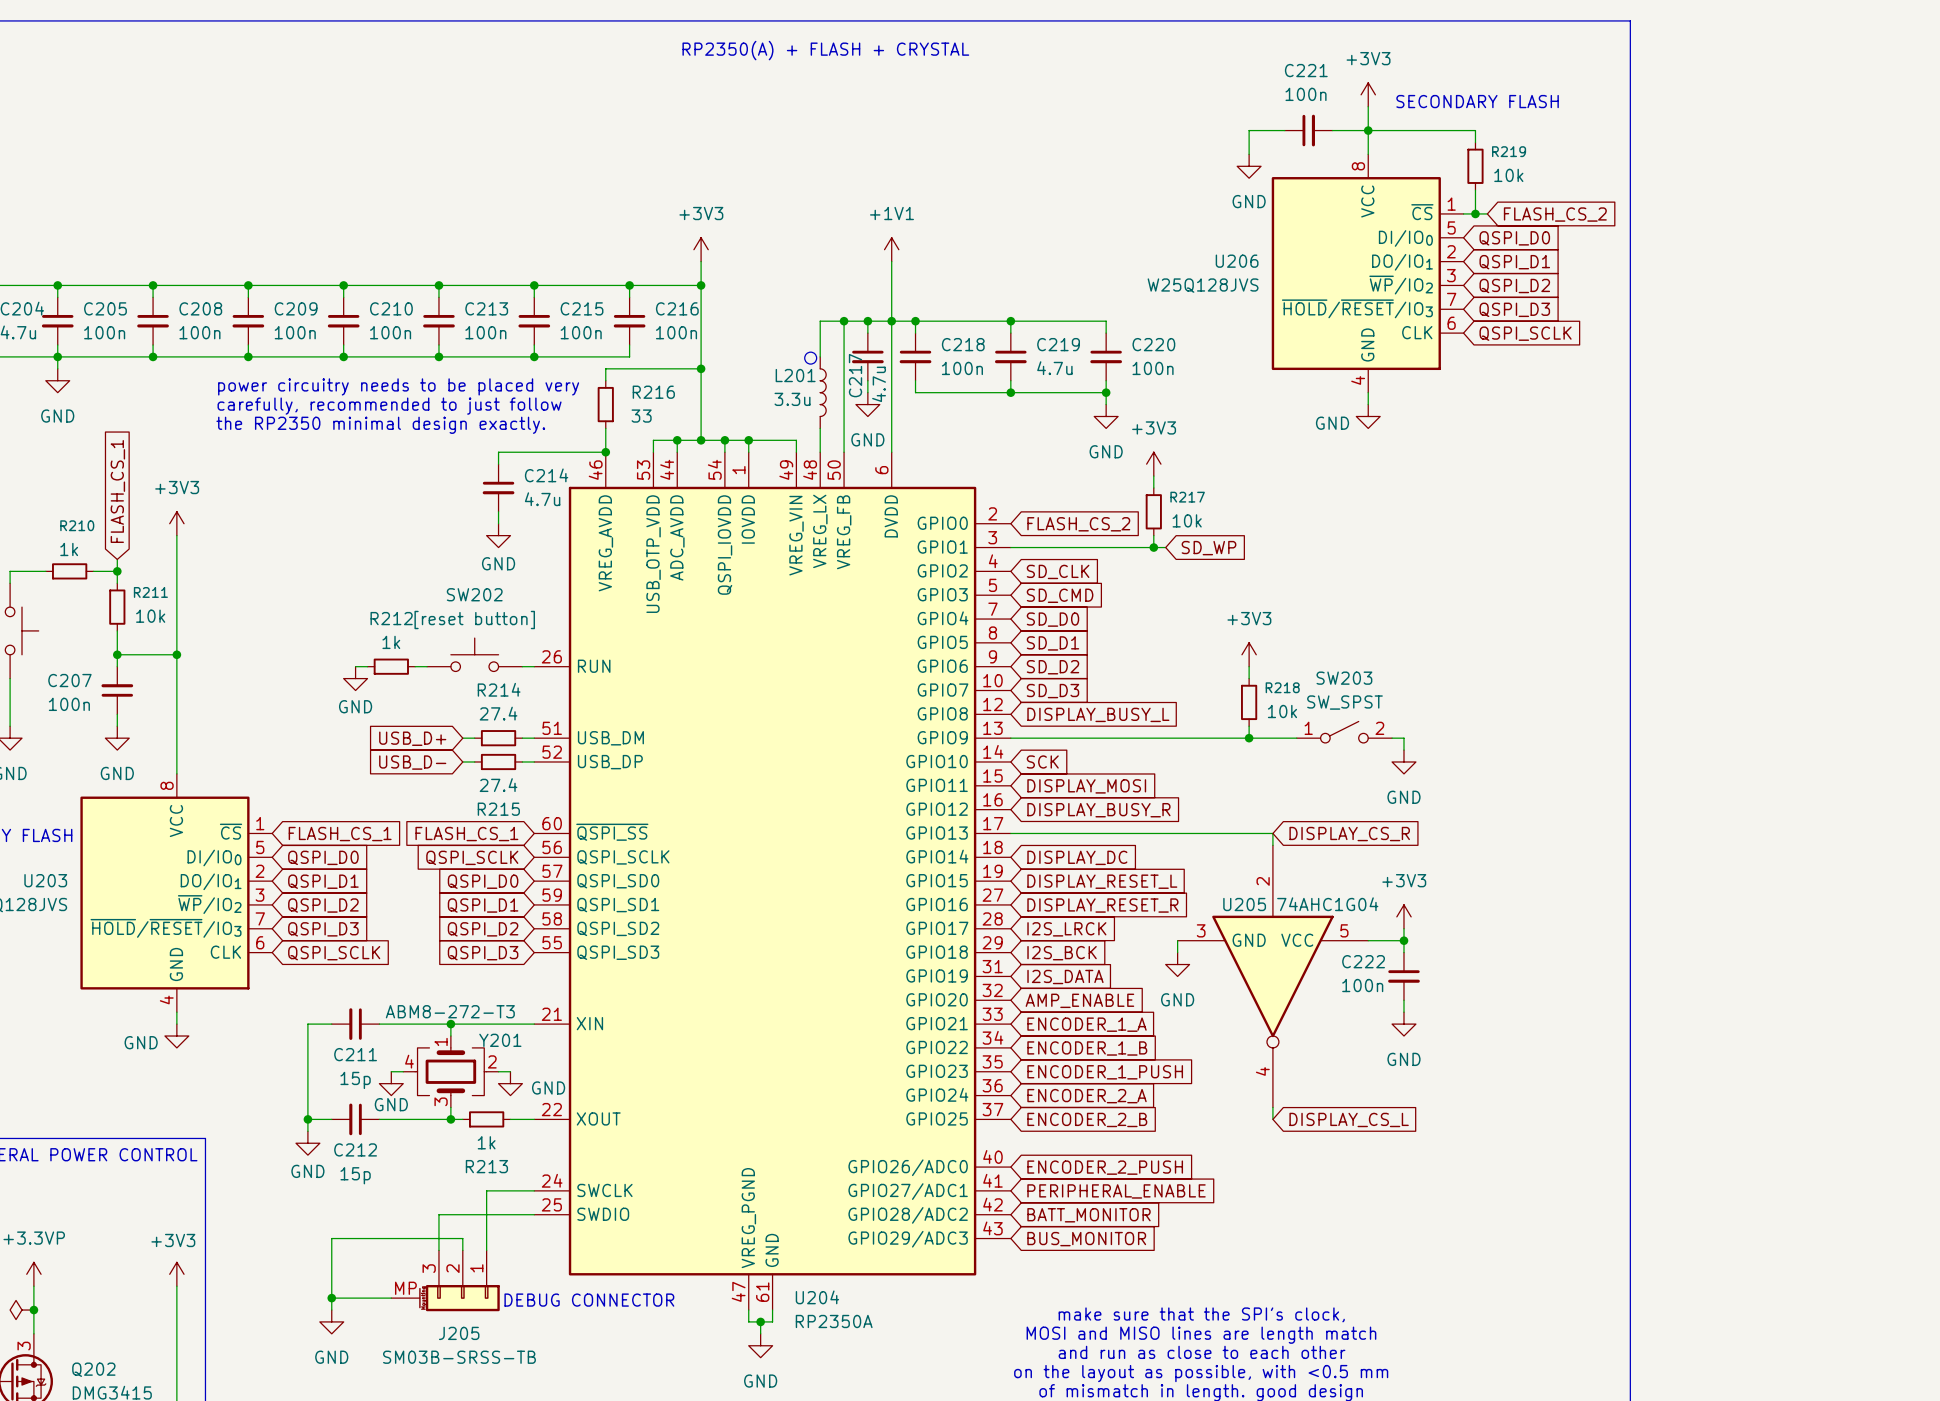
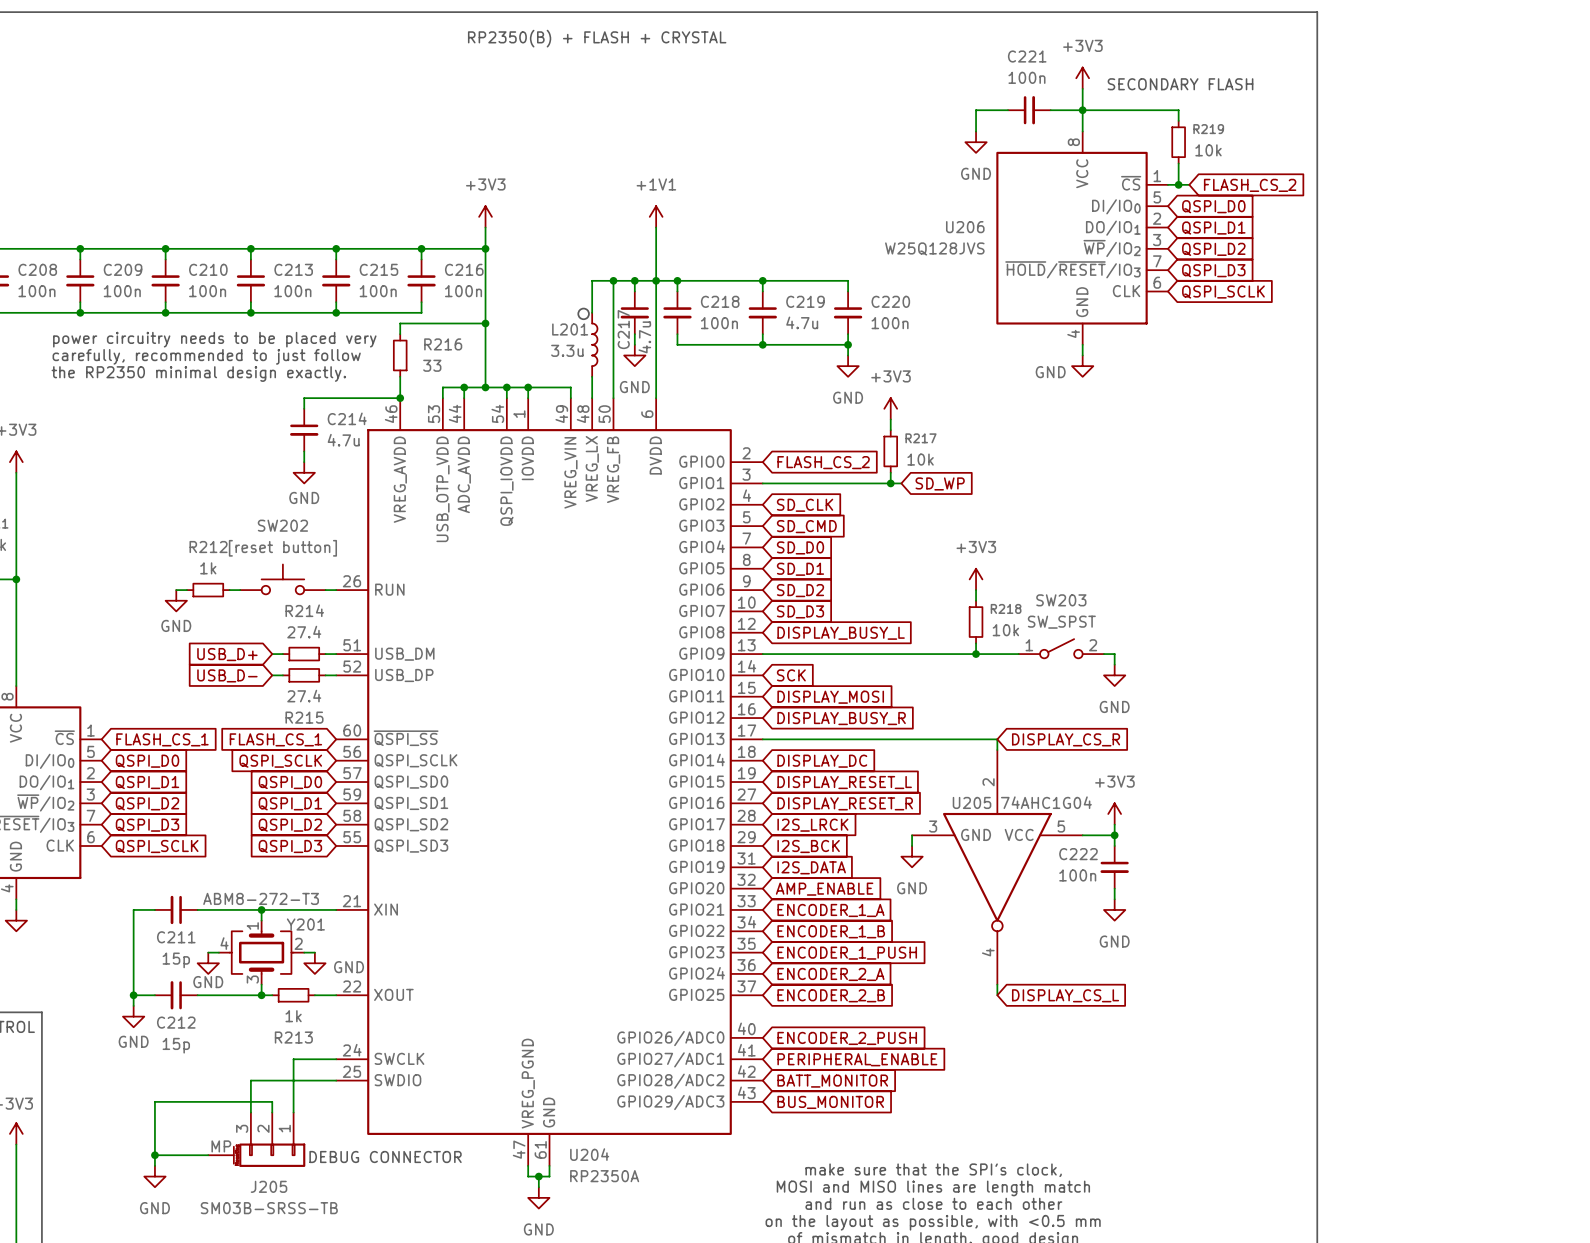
text: RP2350(A) + FLASH + CRYSTAL (825, 50) -> RP2350(B) + FLASH + CRYSTAL (597, 38)

